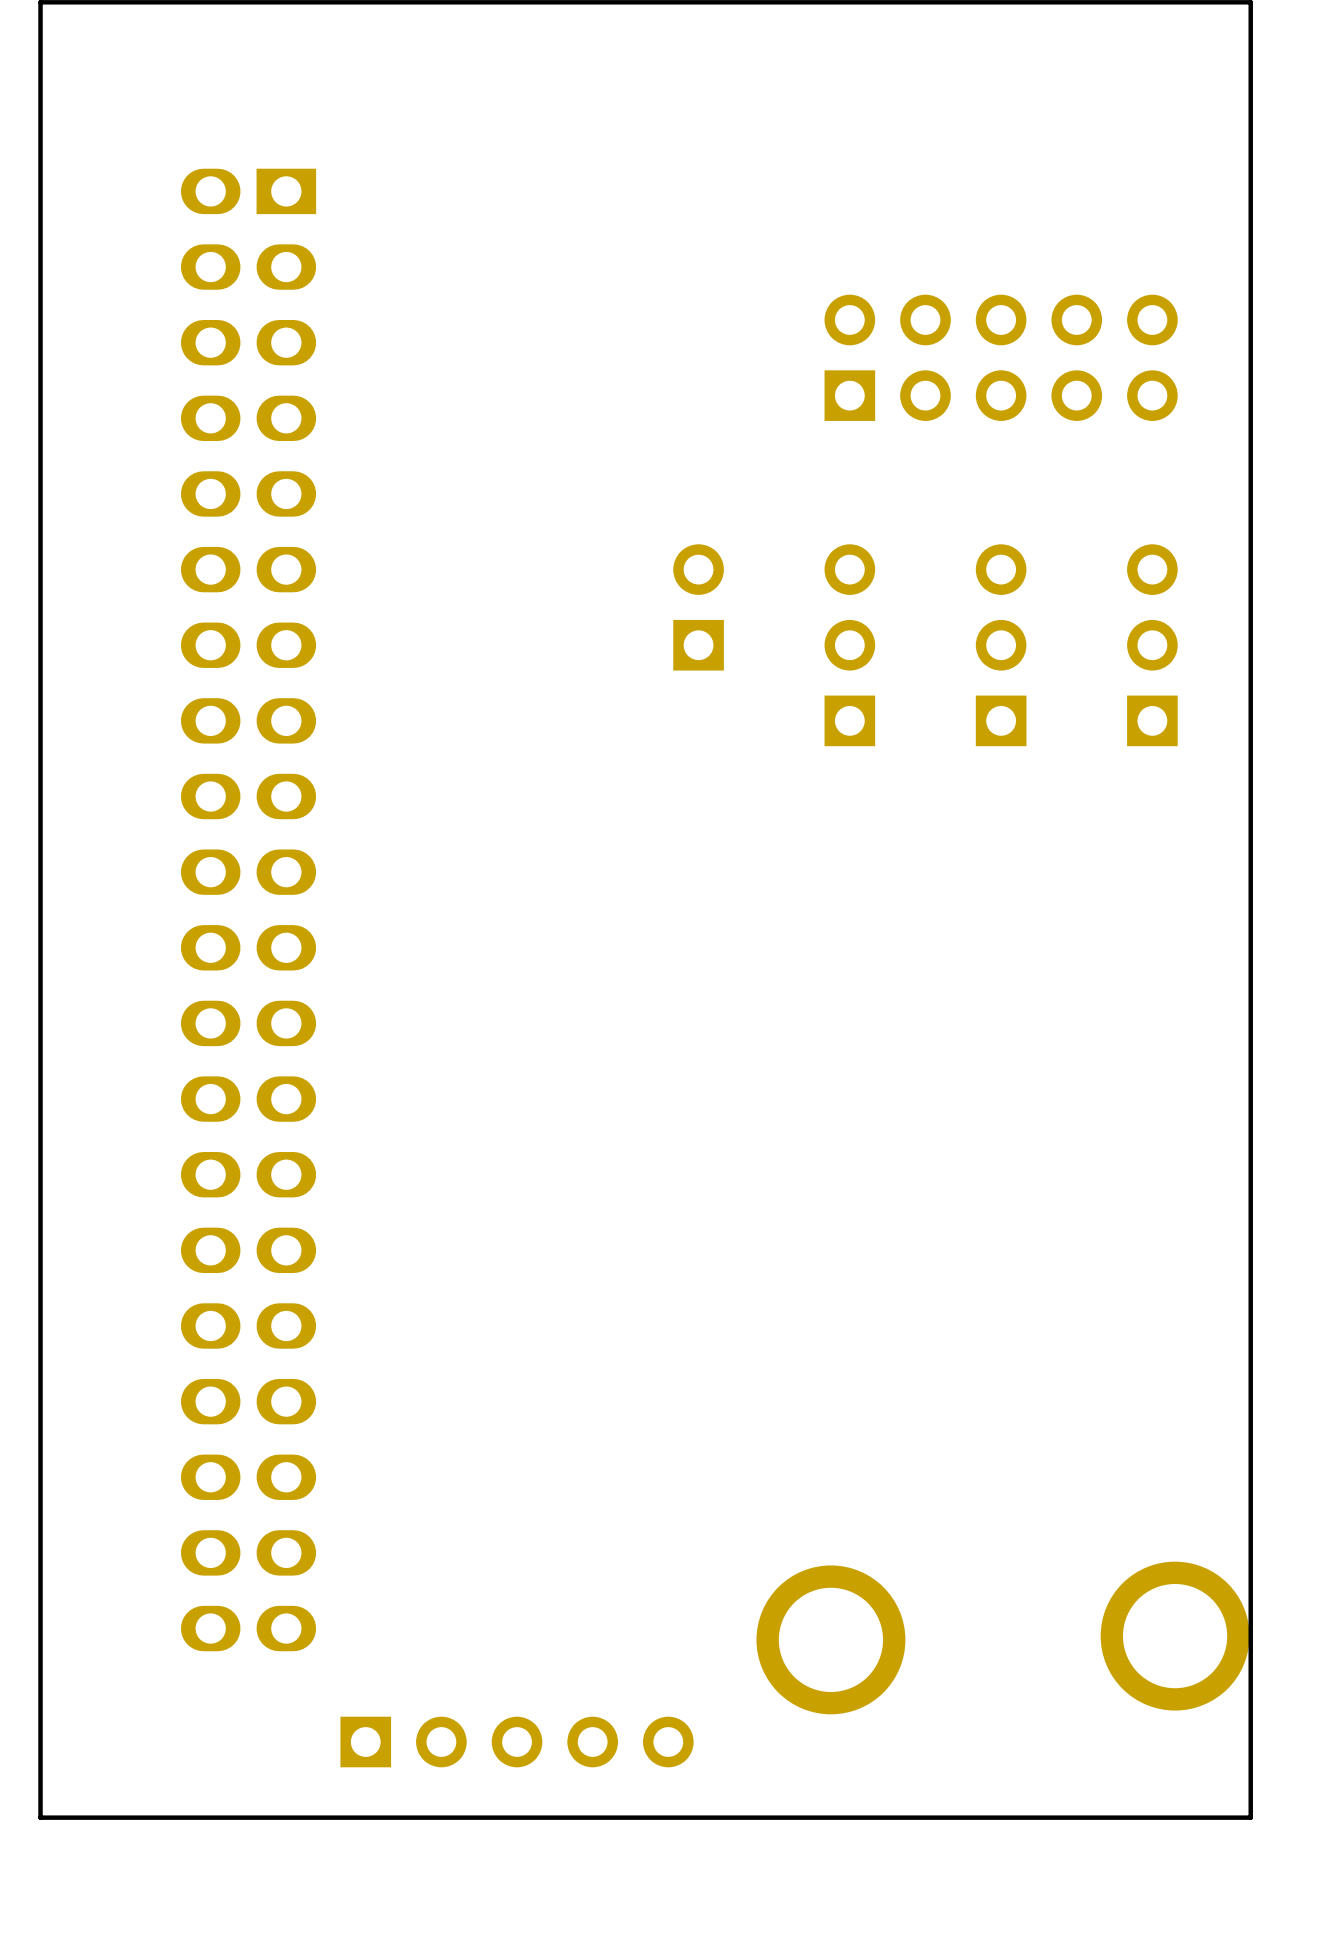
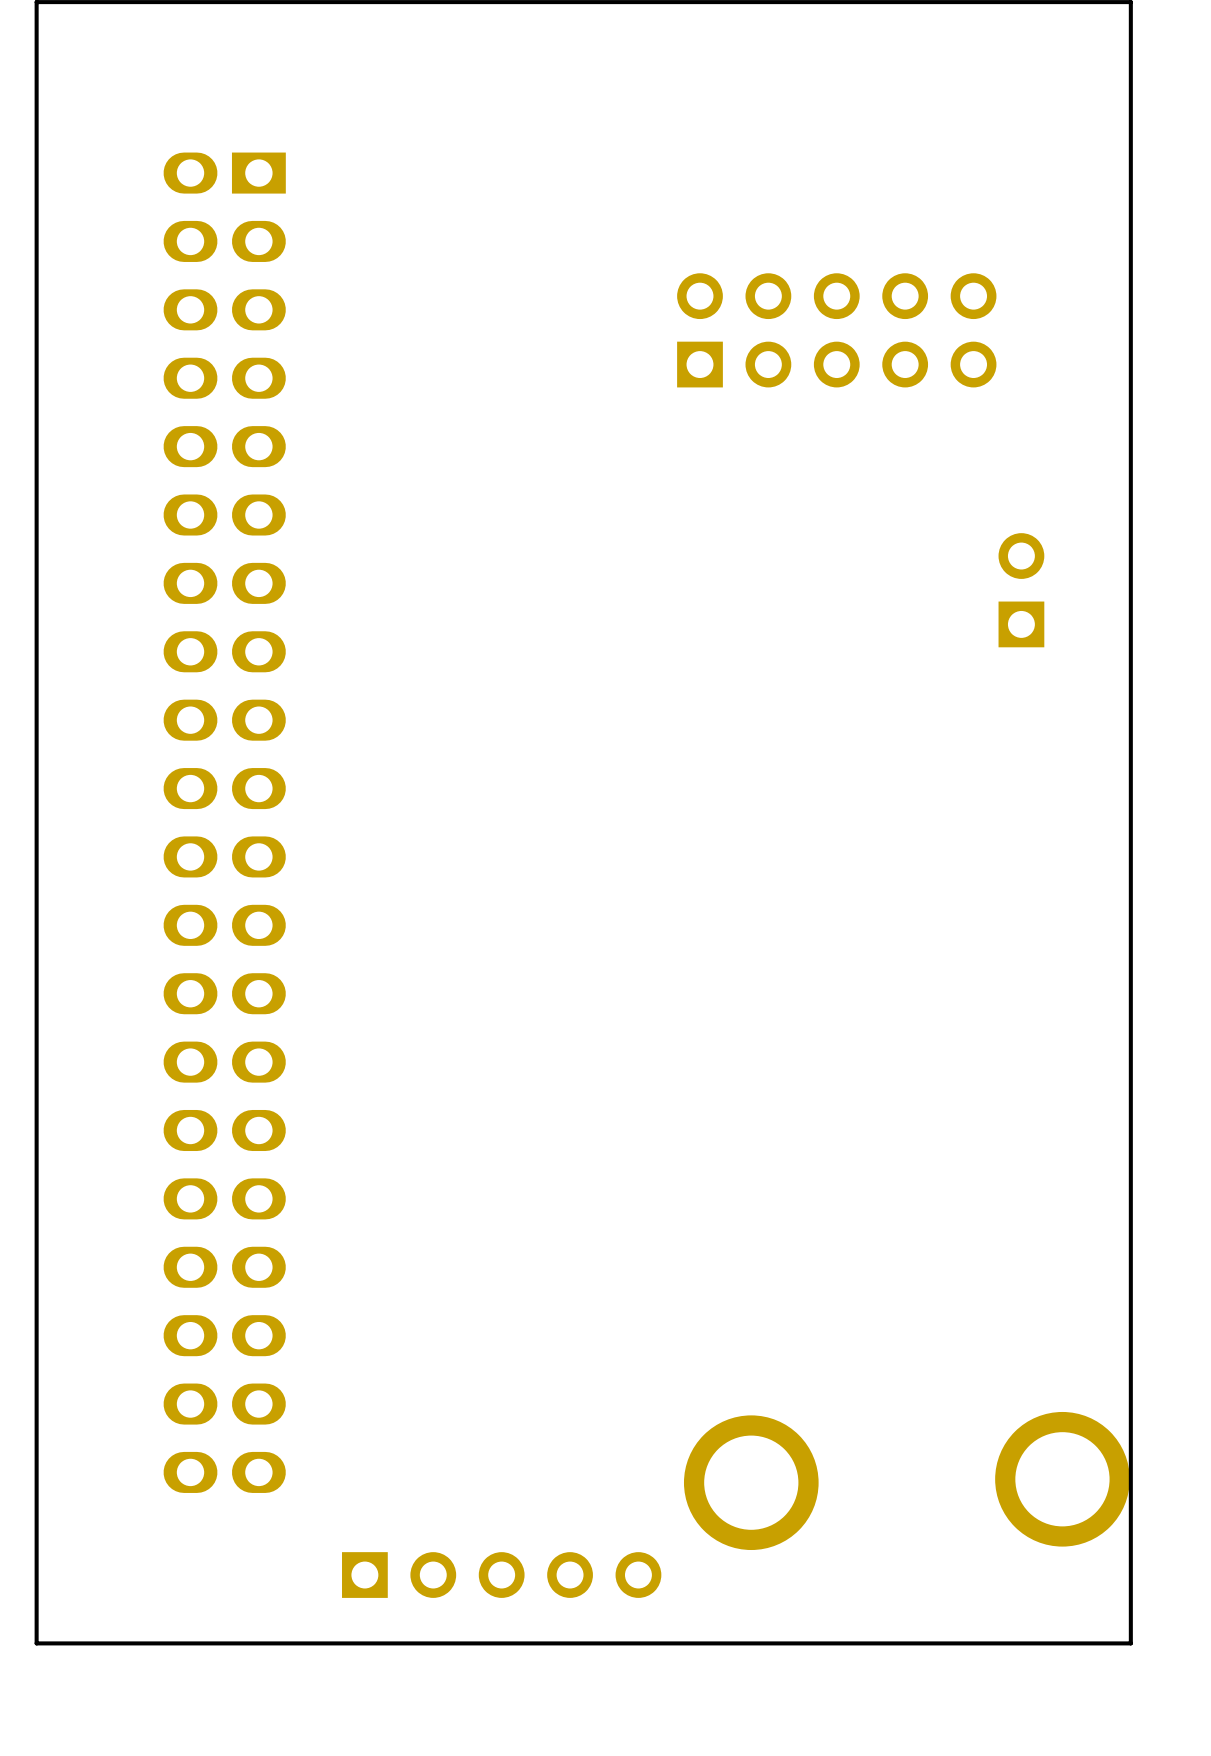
part position: (1001, 357) -> (836, 330)
part footprint: [1127, 544, 1178, 747] -> [998, 533, 1045, 648]
part: (698, 607) -> none
part: (849, 645) -> none
part: (1001, 645) -> none
part position: (517, 1742) -> (501, 1575)

